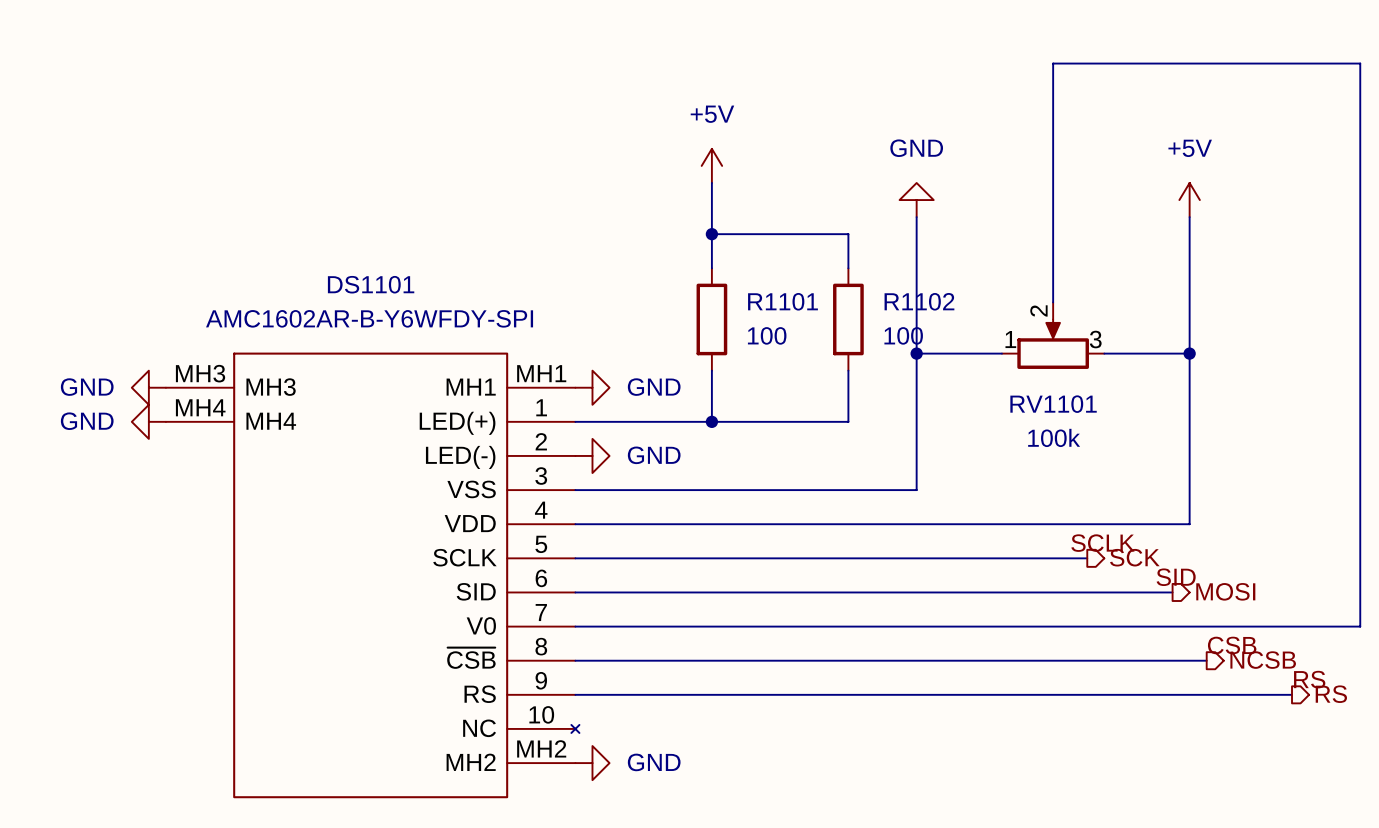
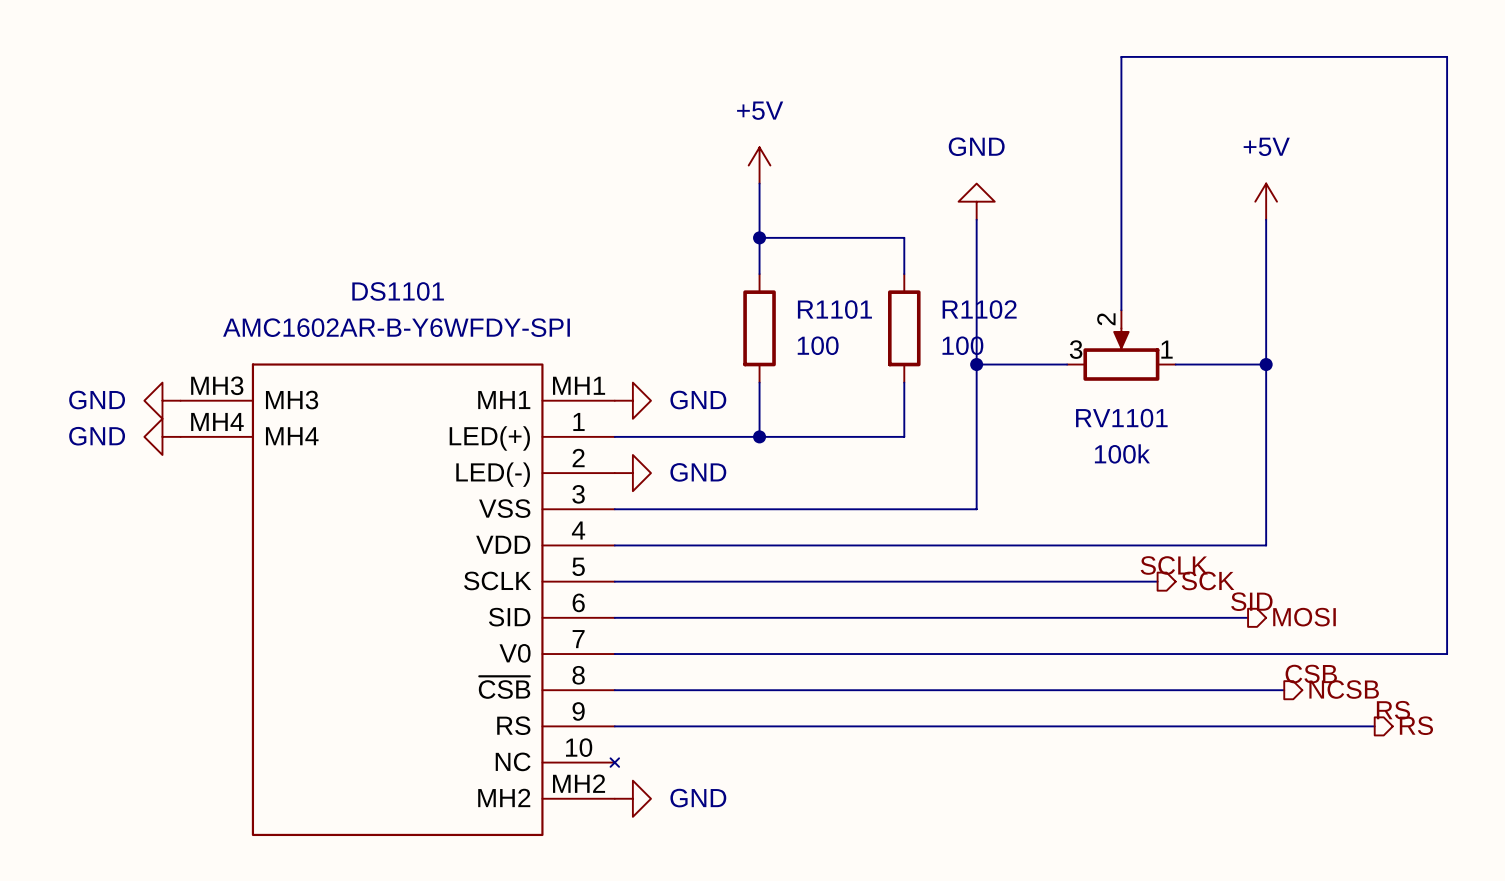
RV1101 flip: as is (1053, 344) -> left-right (1121, 354)

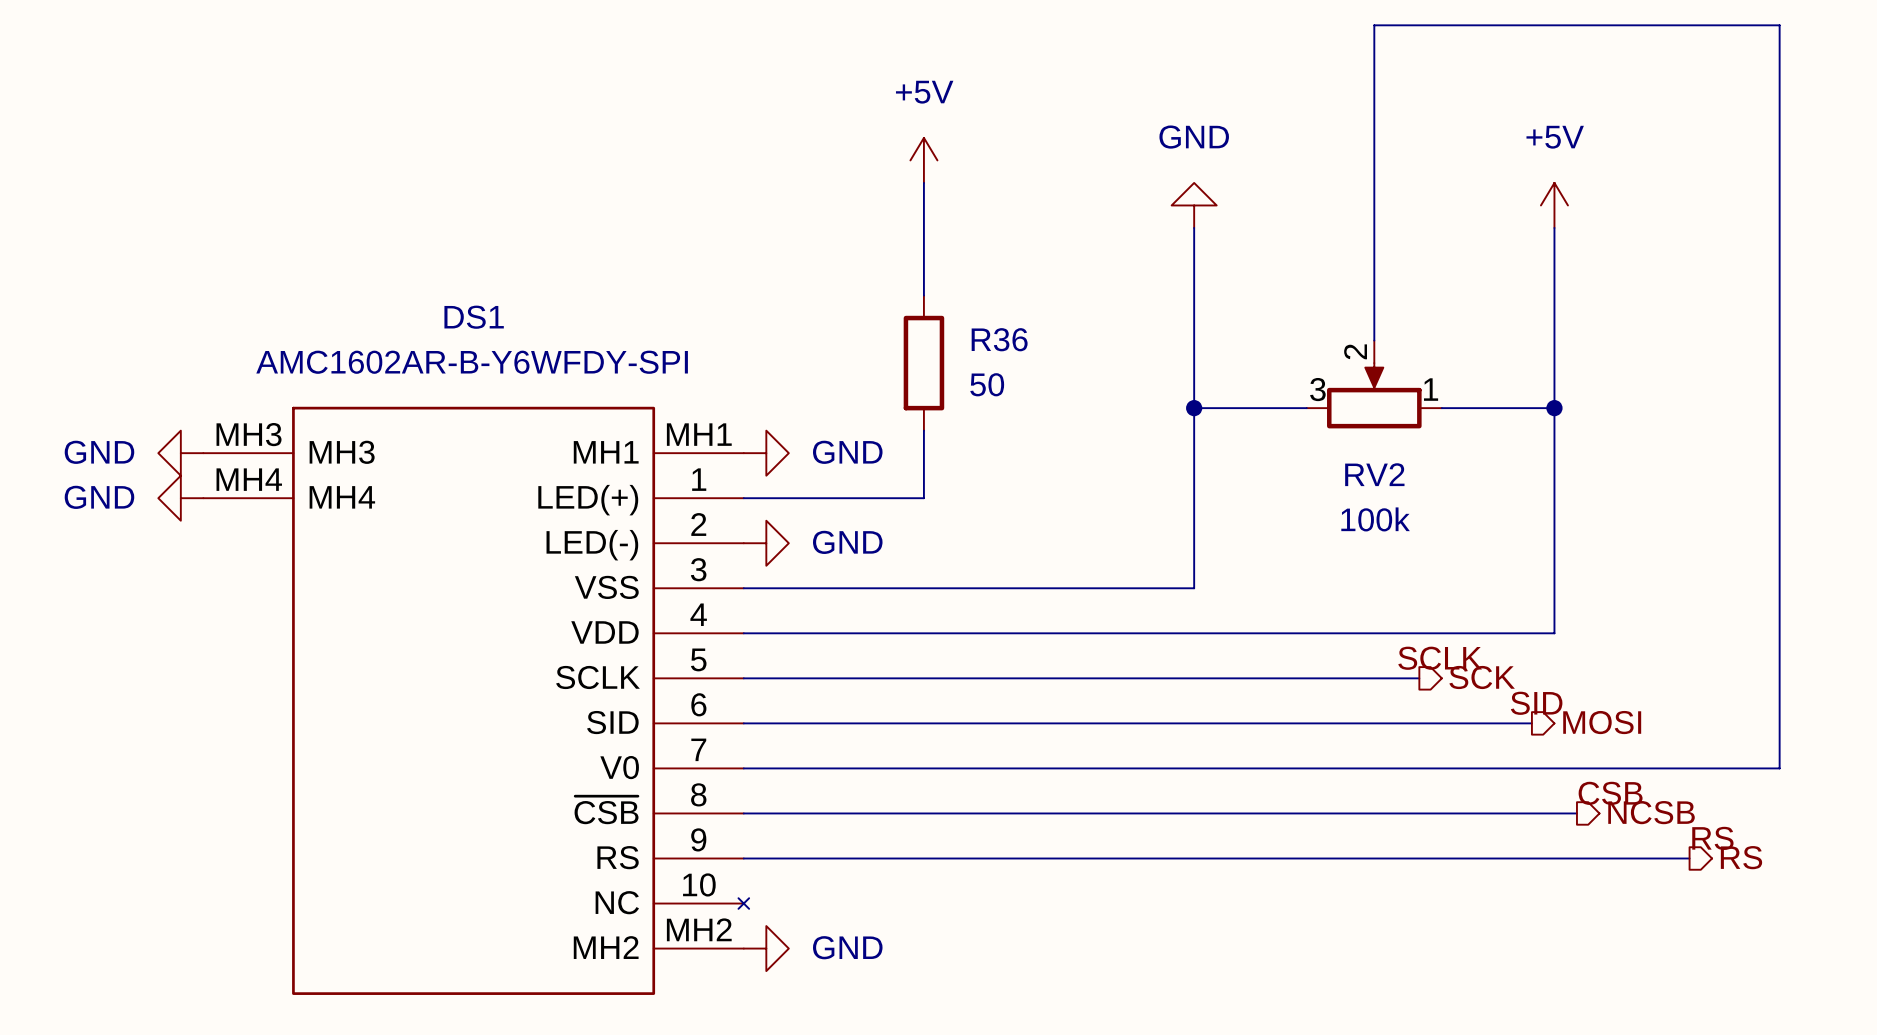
wire: (759, 237) (904, 237) (904, 274) -> none
junction: (759, 237) -> none
DS1101 name: DS1101 (398, 291) -> DS1 (474, 317)
R1101 name: R1101 (834, 309) -> R36 (999, 339)
R1102: 100 (904, 328) -> none
R1101 value: 100 (818, 345) -> 50 (987, 384)
wire: (904, 382) (904, 436) (759, 436) -> none
RV1101 name: RV1101 (1121, 418) -> RV2 (1374, 474)
junction: (759, 436) -> none

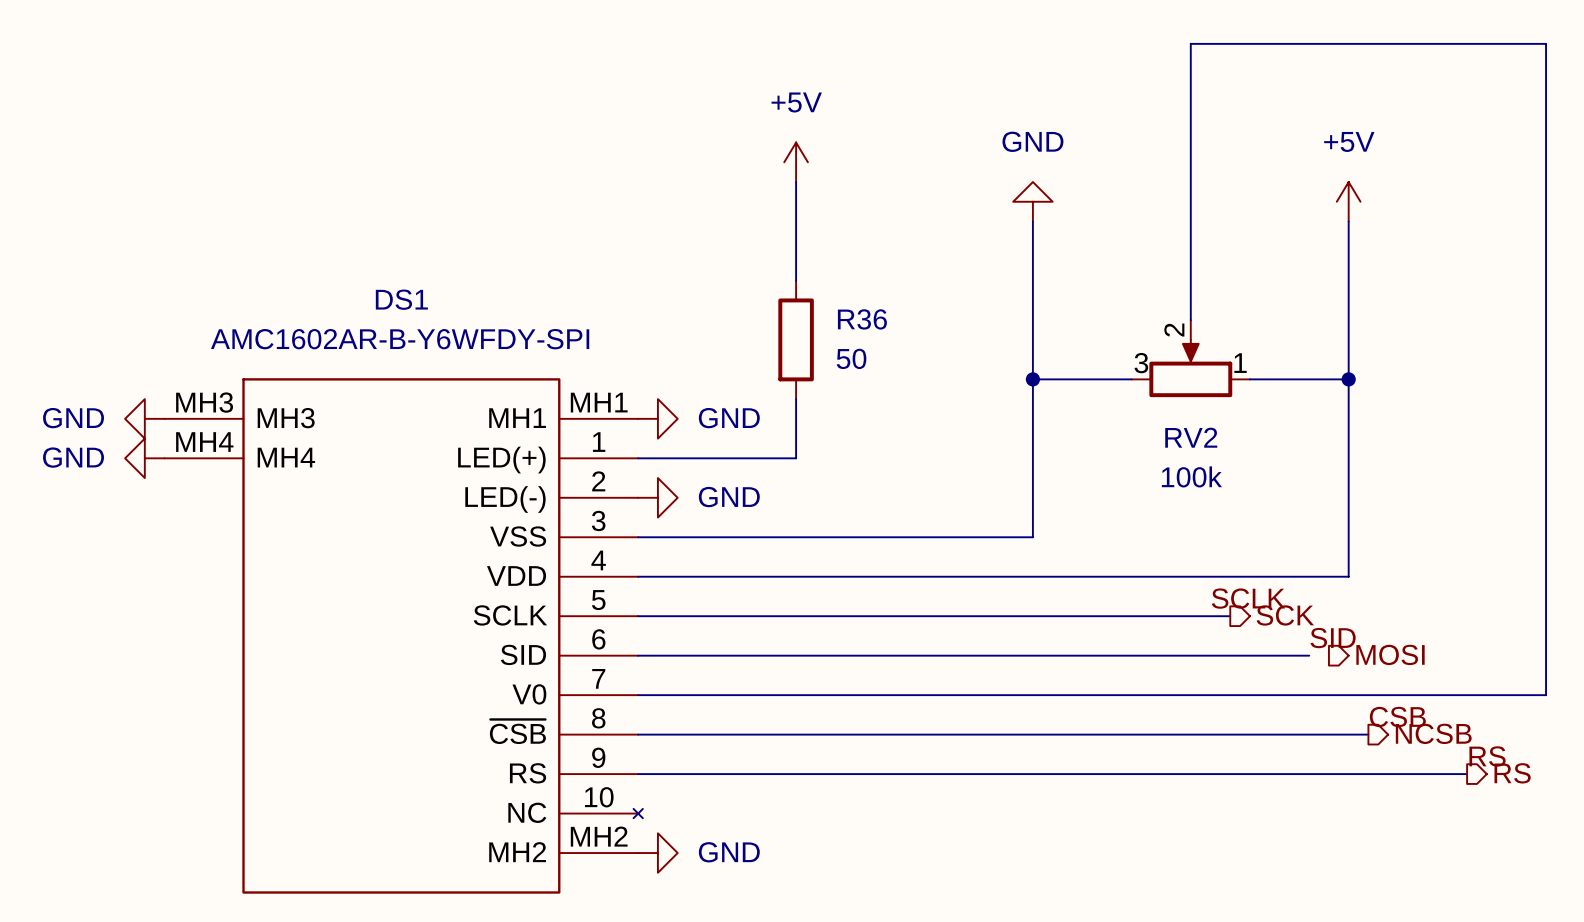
wire: (1509, 723) (1531, 723) -> none

